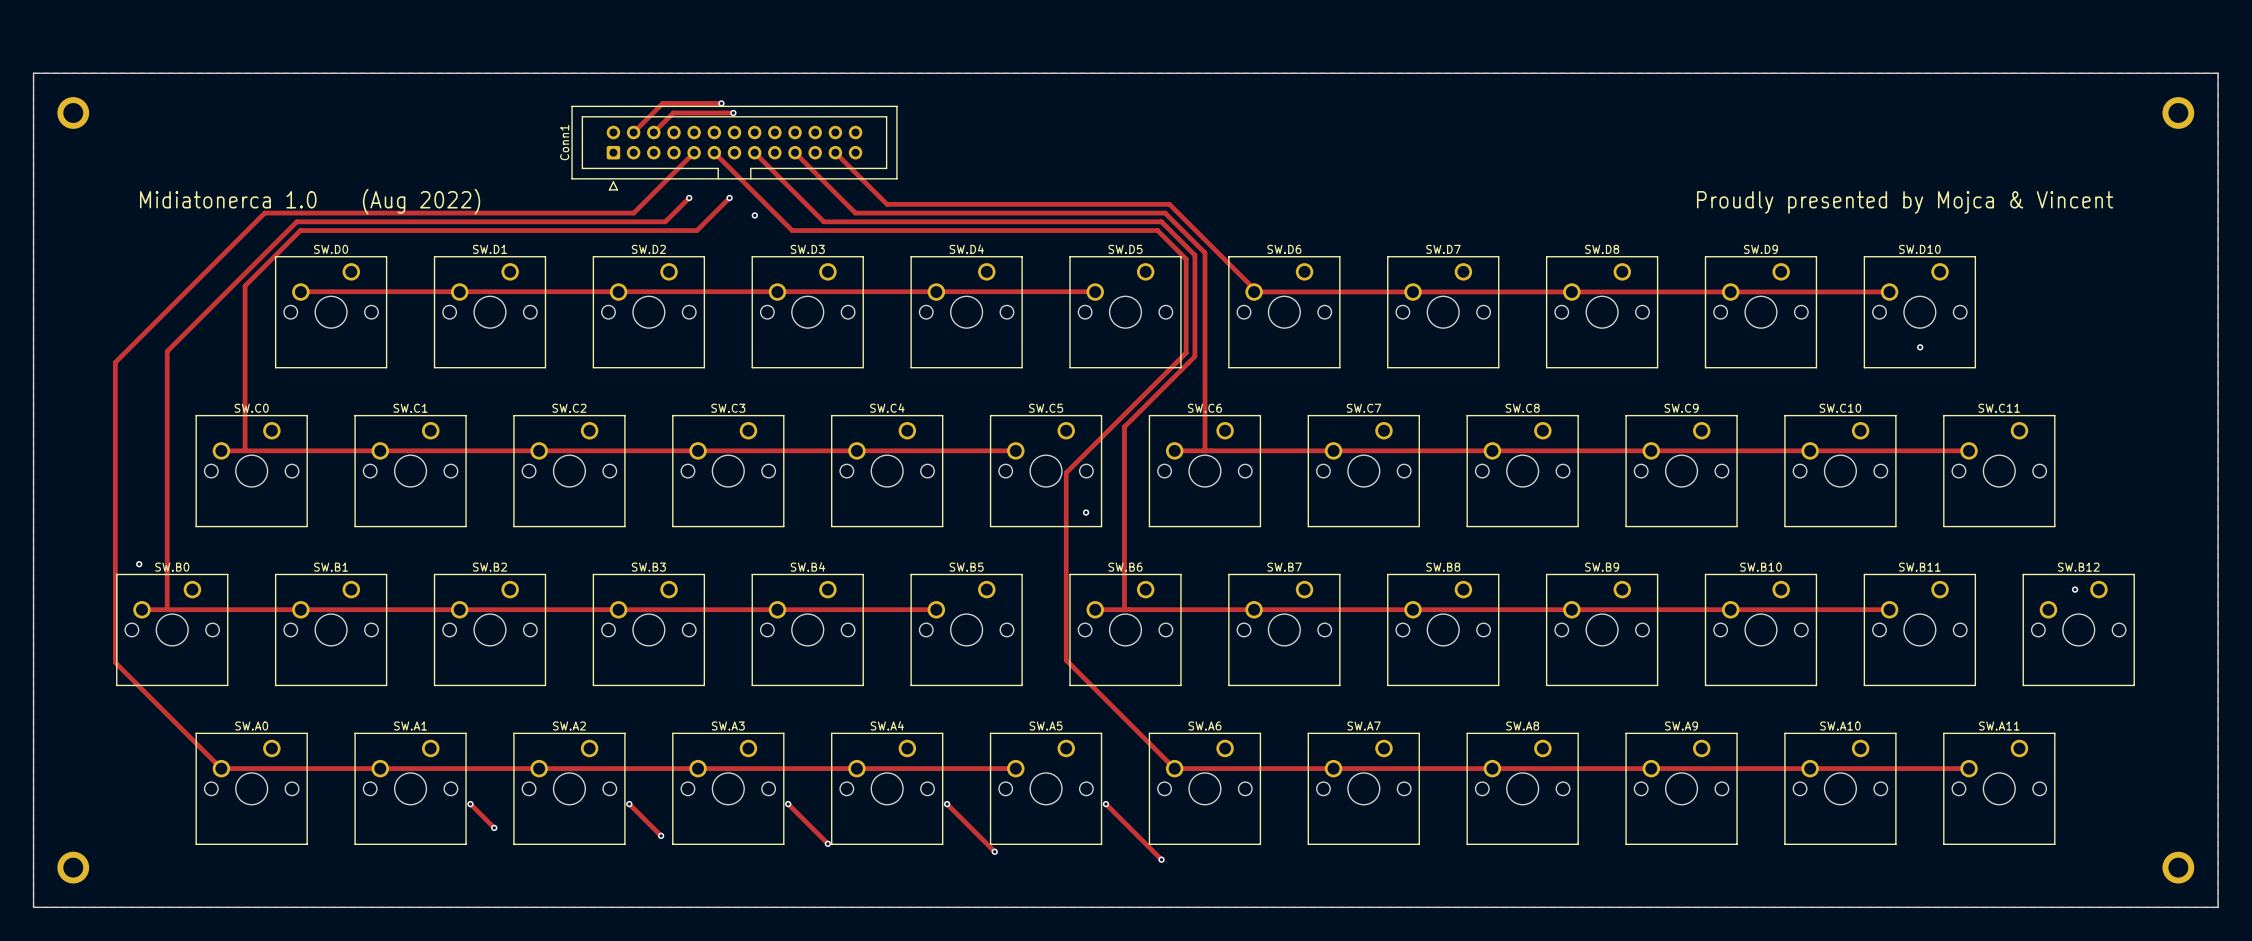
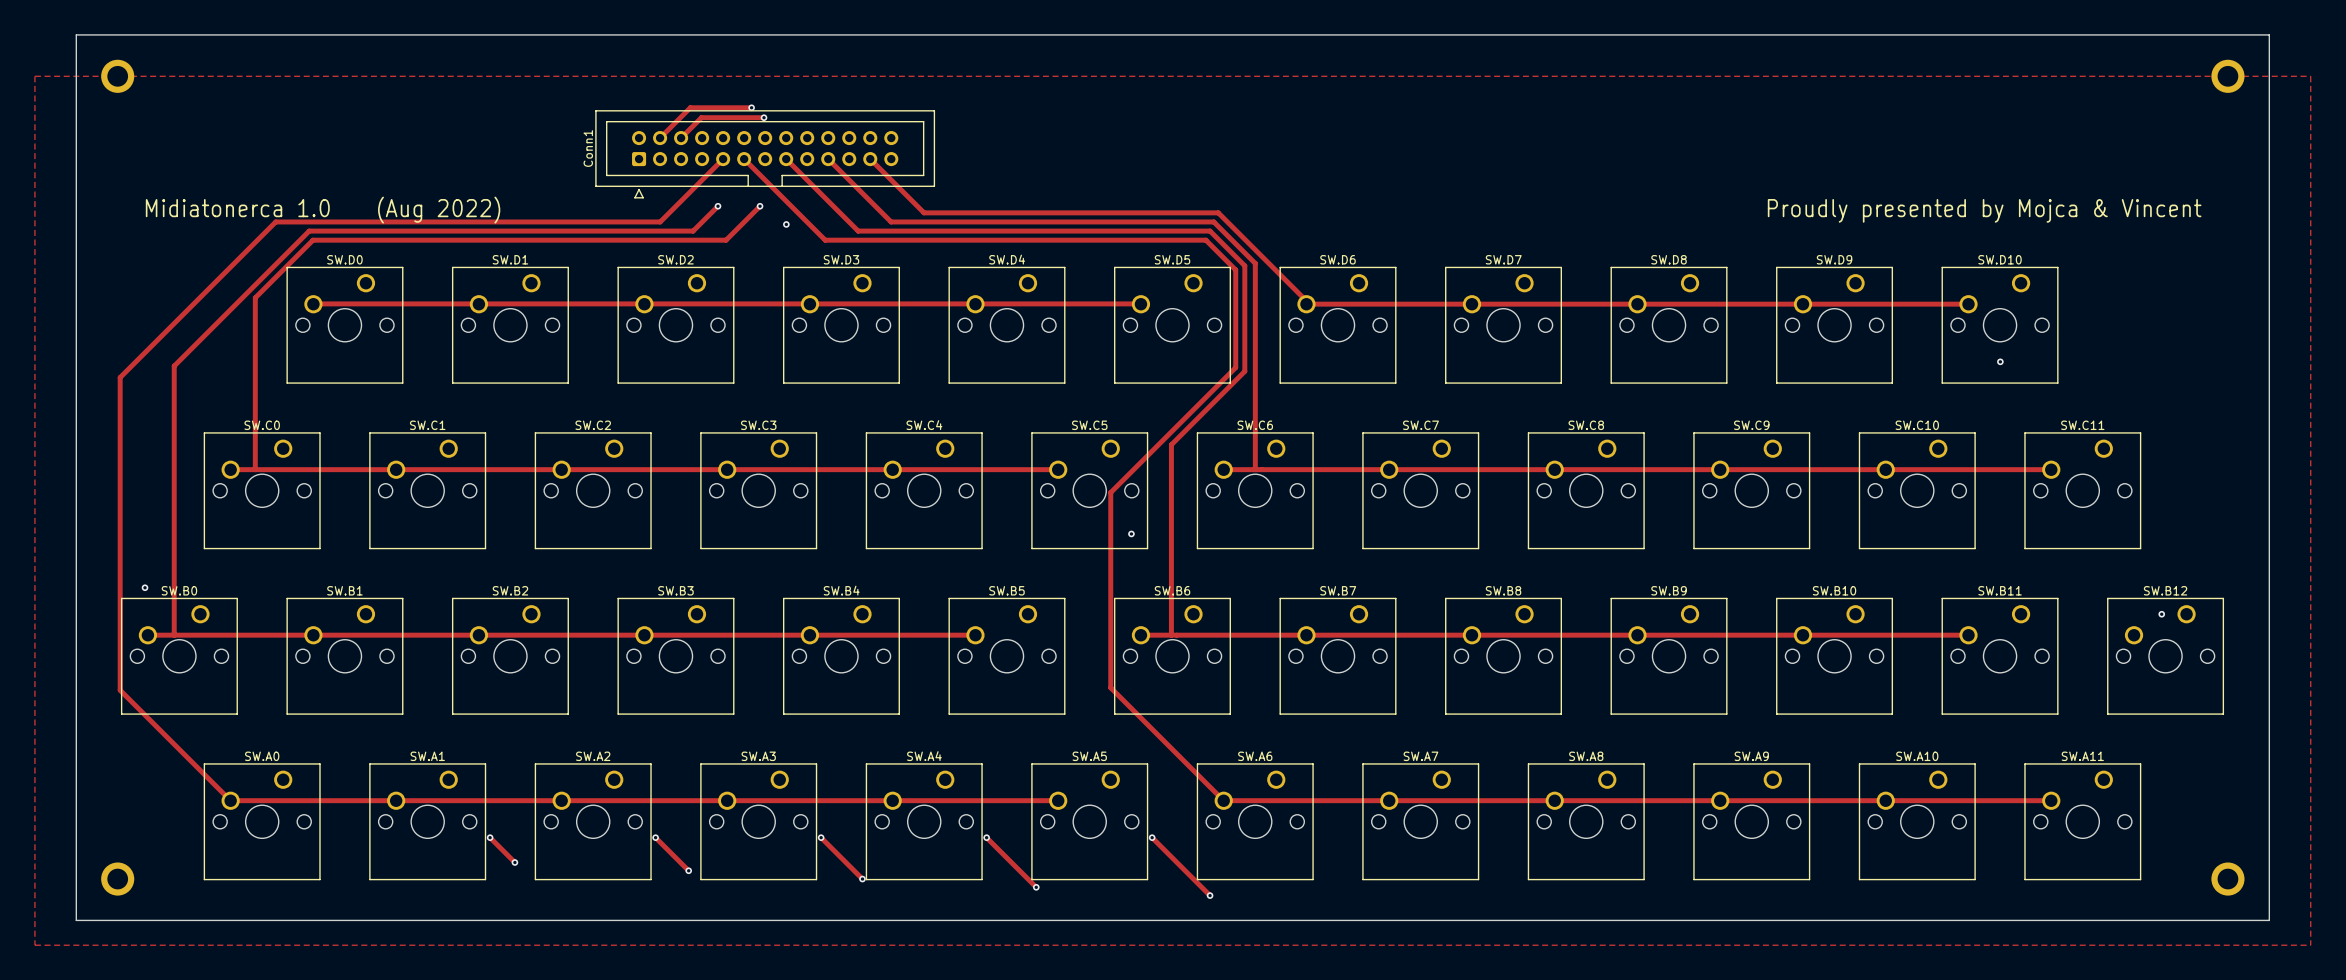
board edge: (33, 73) (2218, 73) (2218, 907) (33, 907) (33, 73) -> (76, 34) (76, 920) (2269, 920) (2269, 34) (76, 34)
part position: (73, 112) -> (117, 76)
part position: (2178, 112) -> (2227, 76)
part position: (73, 867) -> (117, 879)
part position: (2178, 867) -> (2227, 879)

